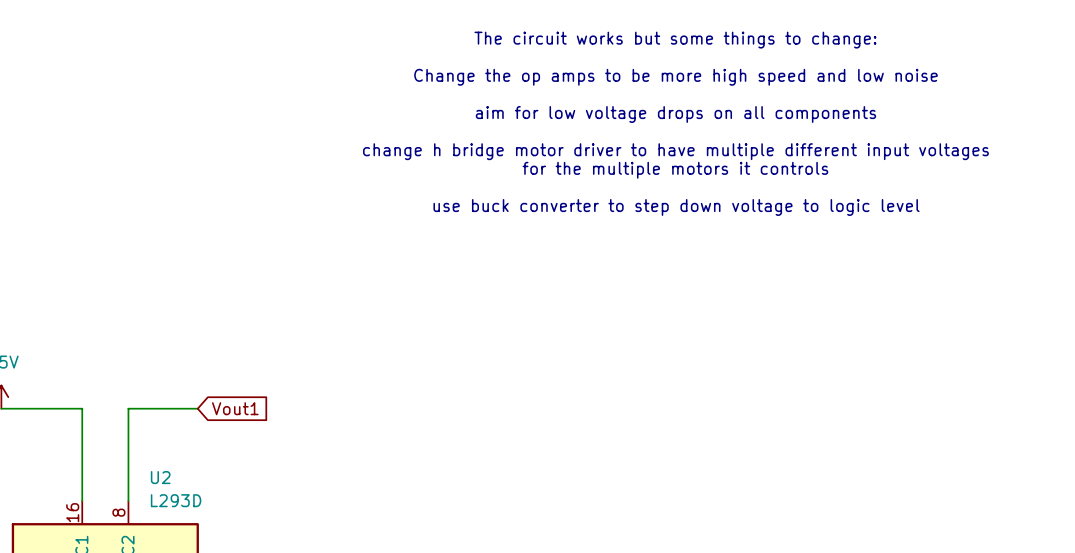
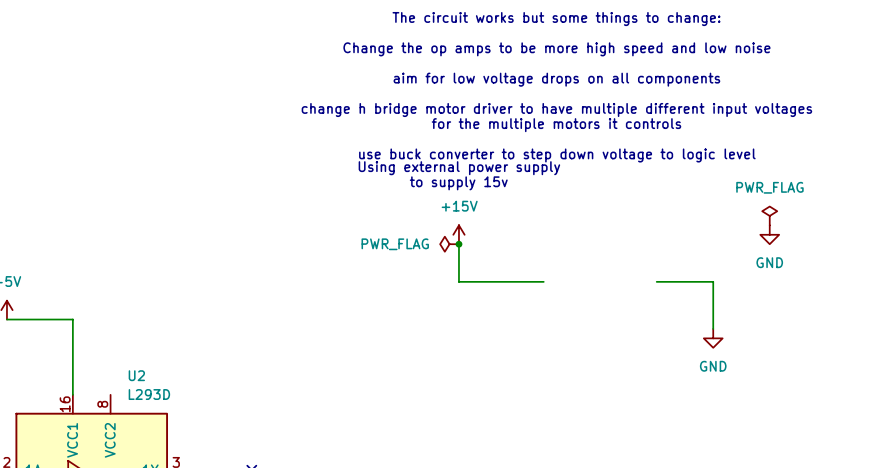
text: none -> Using external power supply (459, 168)
text: none -> to supply 15v (458, 183)
power symbol: none -> PWR_FLAG (769, 215)
power symbol: none -> +15V (458, 234)
power symbol: none -> GND (769, 234)
power symbol: none -> PWR_FLAG (449, 244)
wire: none -> (458, 244) (458, 281) (543, 281)
junction: none -> (458, 244)
wire: none -> (656, 281) (713, 281) (713, 328)
wire: (197, 408) (128, 408) (128, 501) -> none
global label: Vout1 (235, 408) -> none
power symbol: none -> GND (713, 338)

